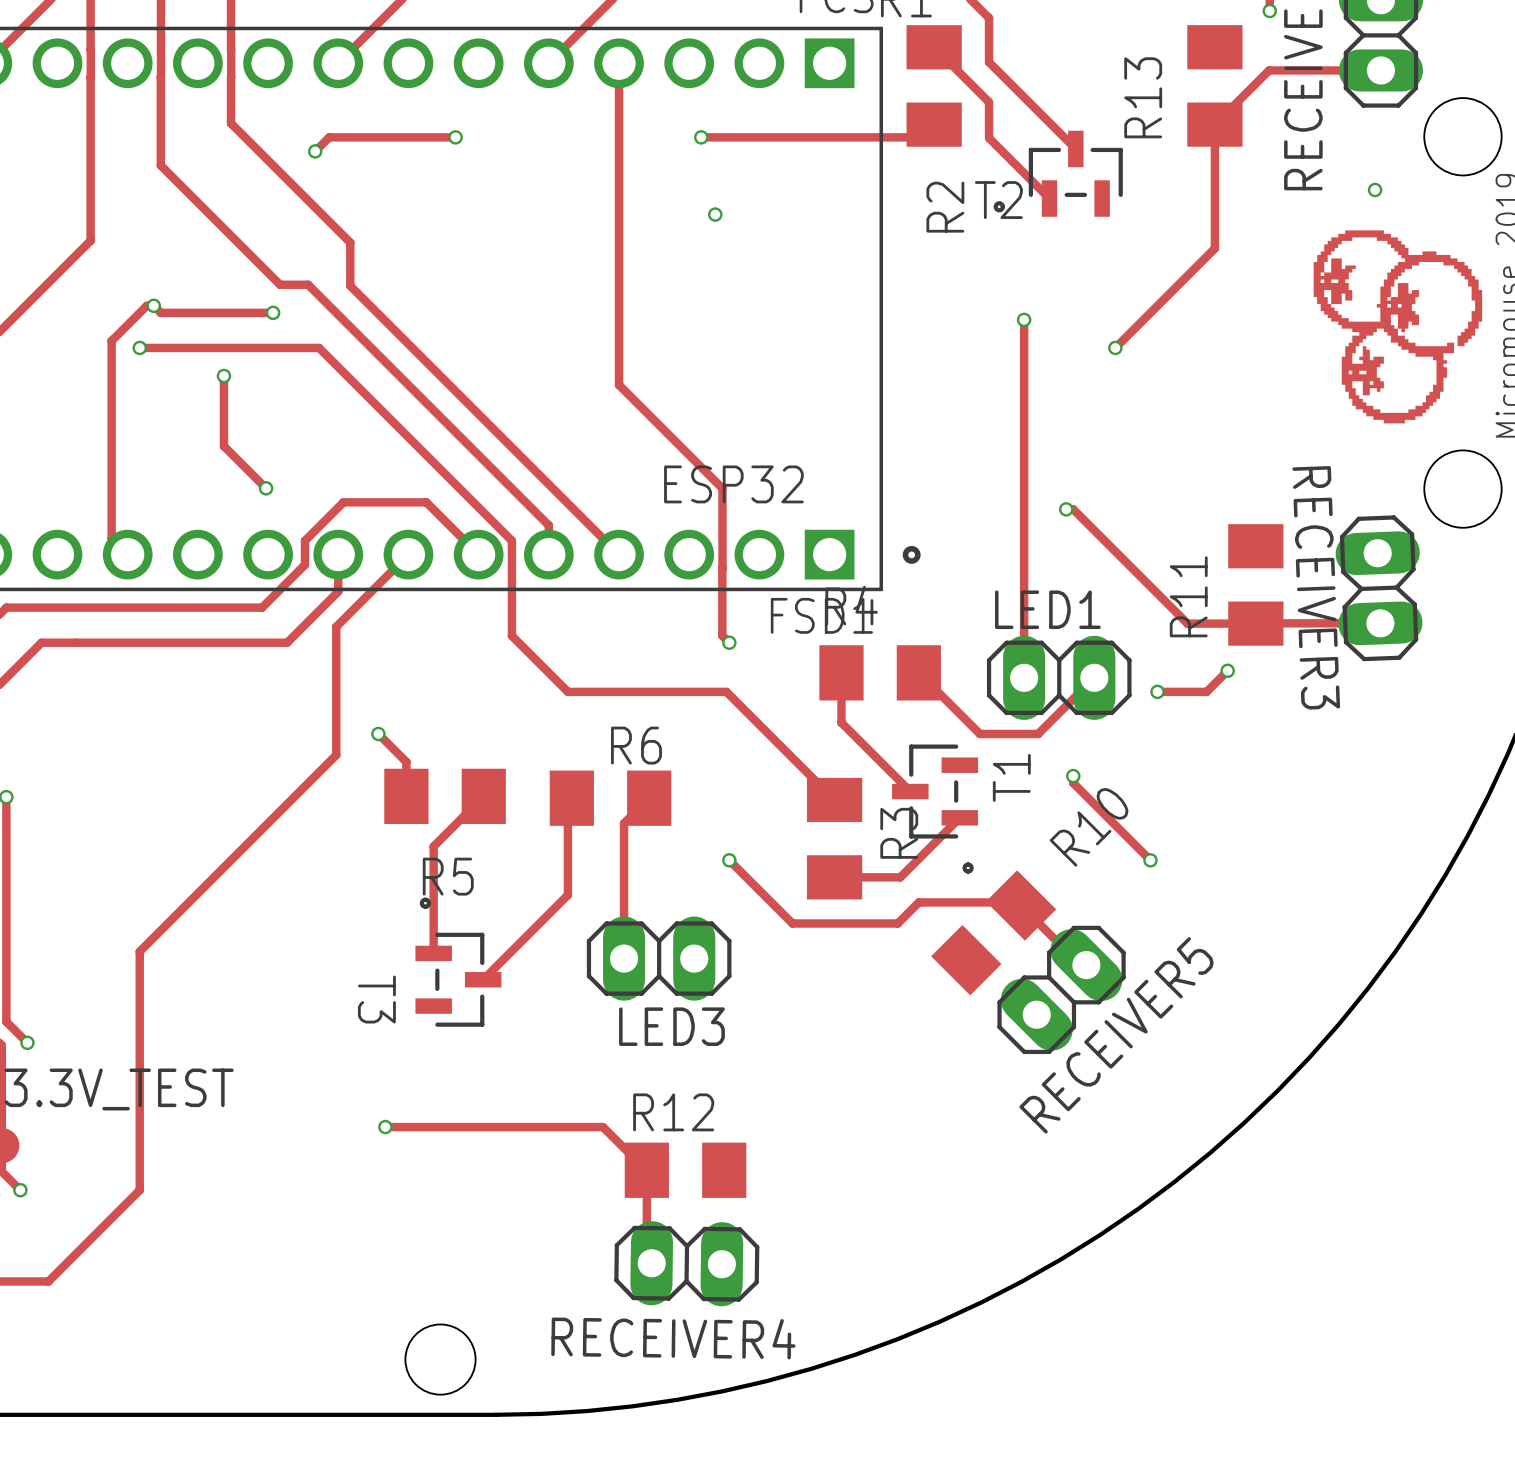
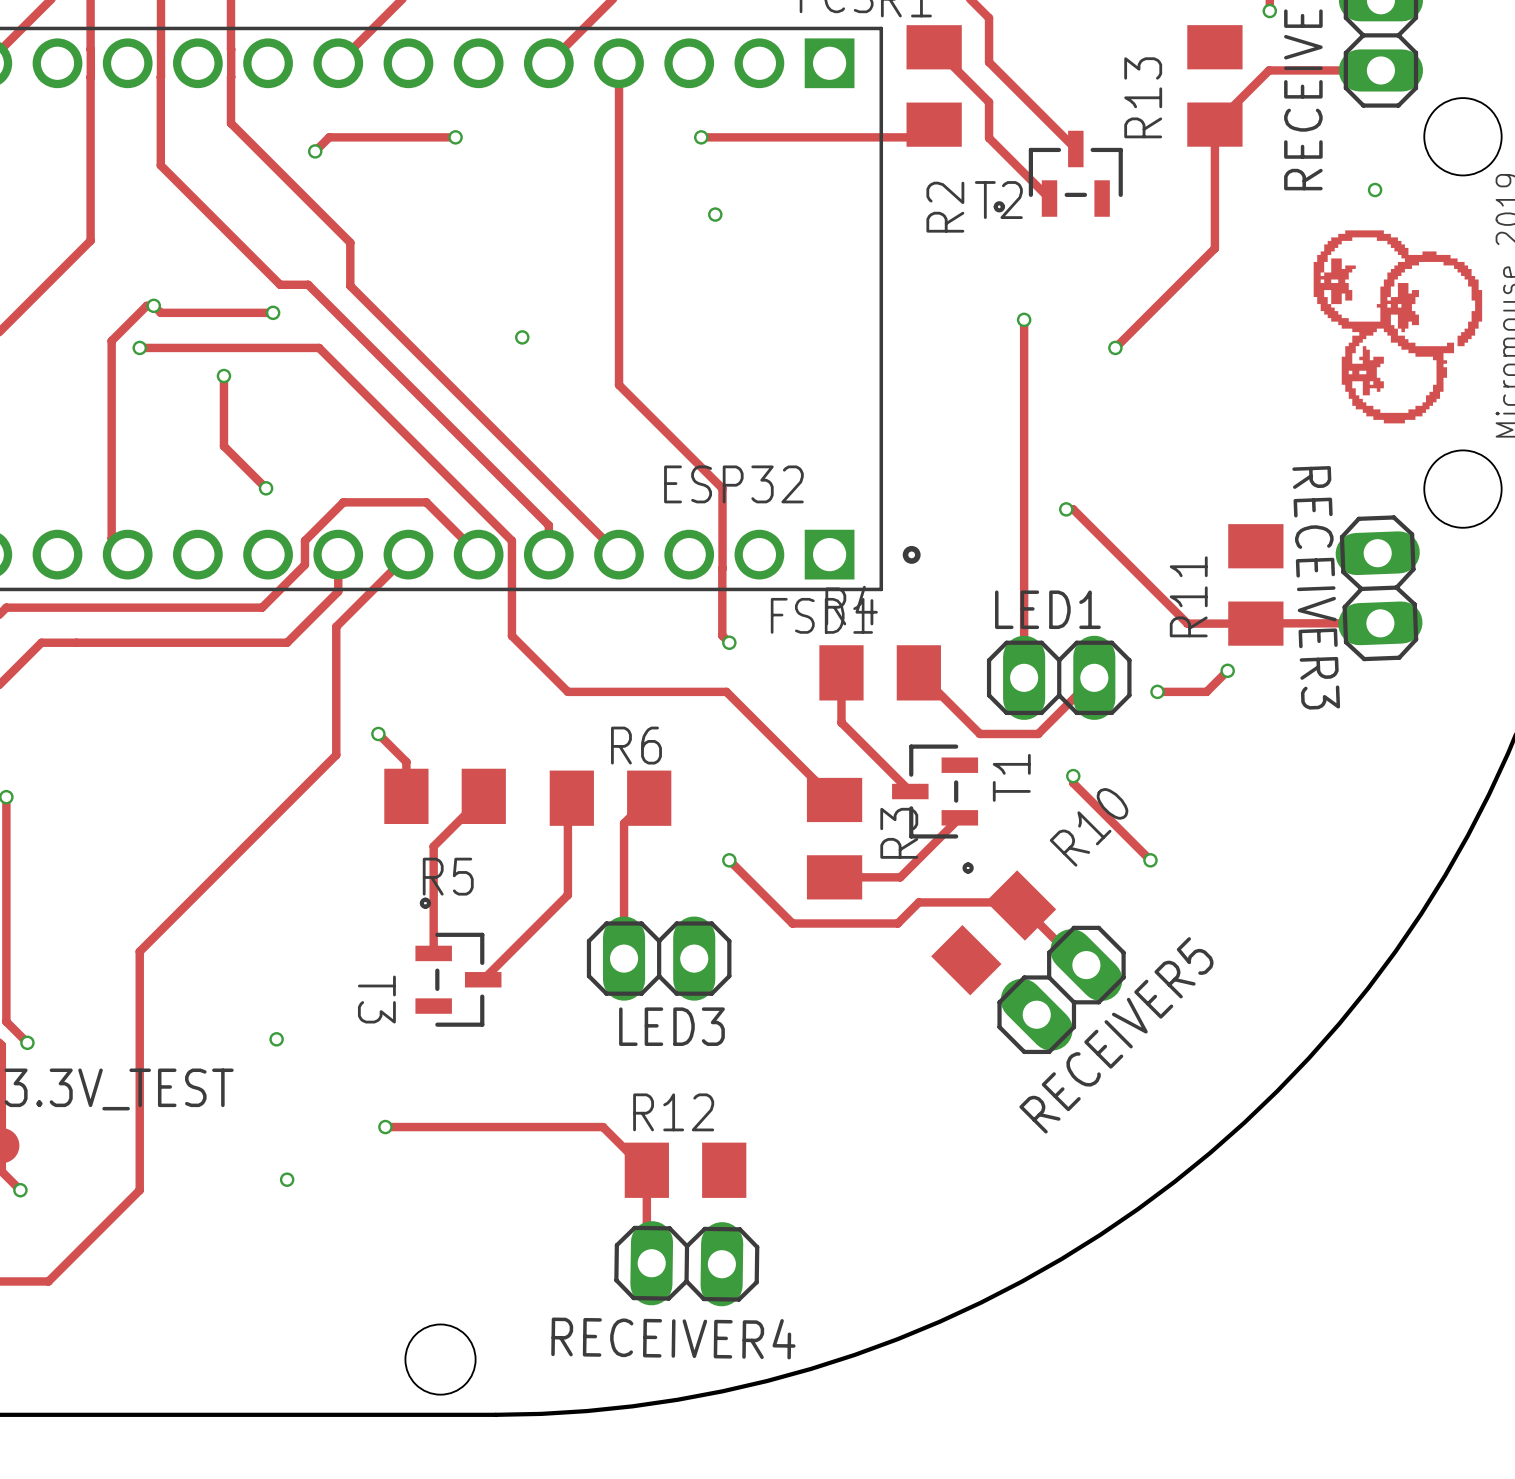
via: none -> (522, 337)
via: none -> (276, 1039)
via: none -> (287, 1179)

